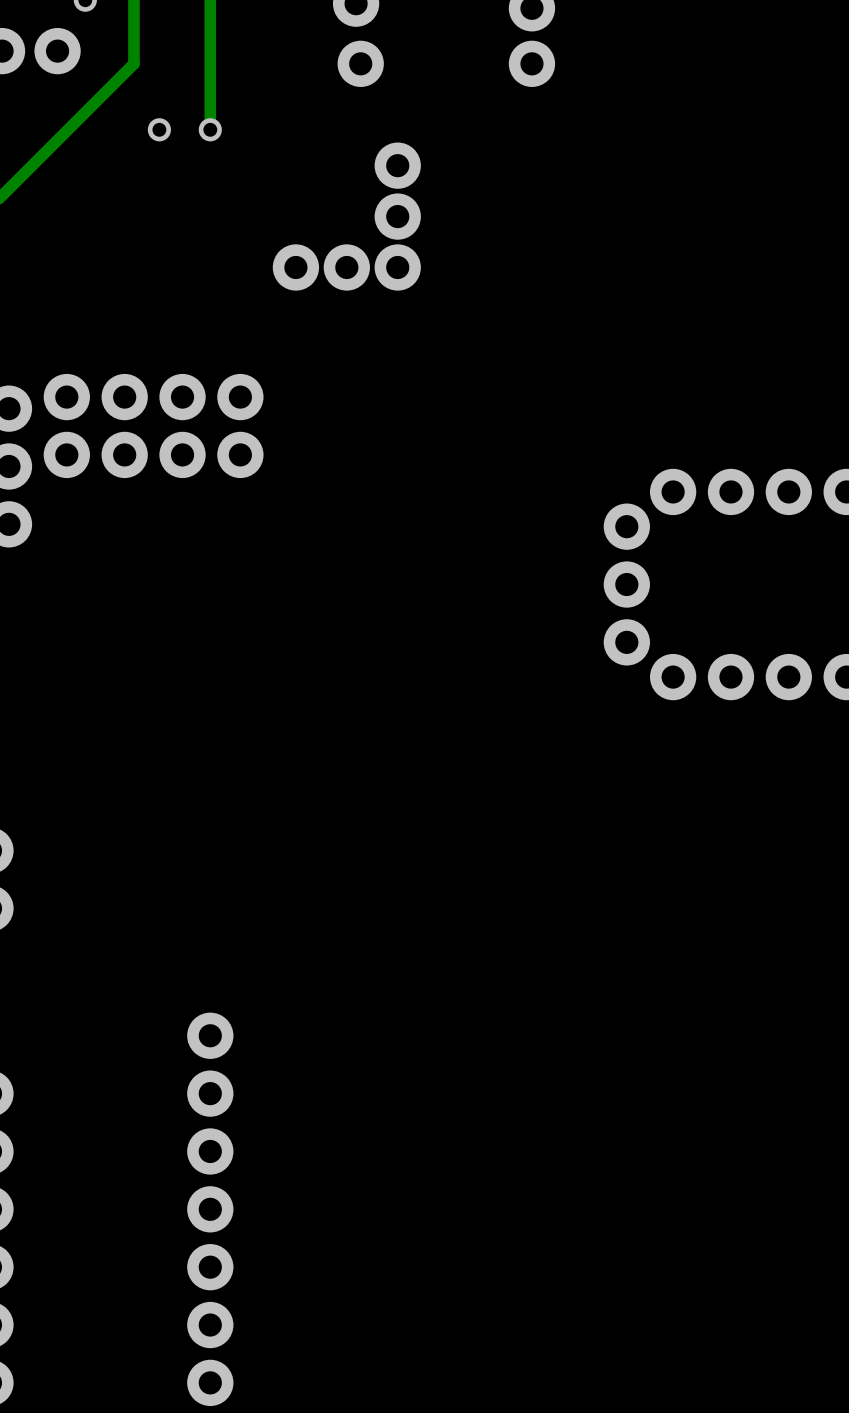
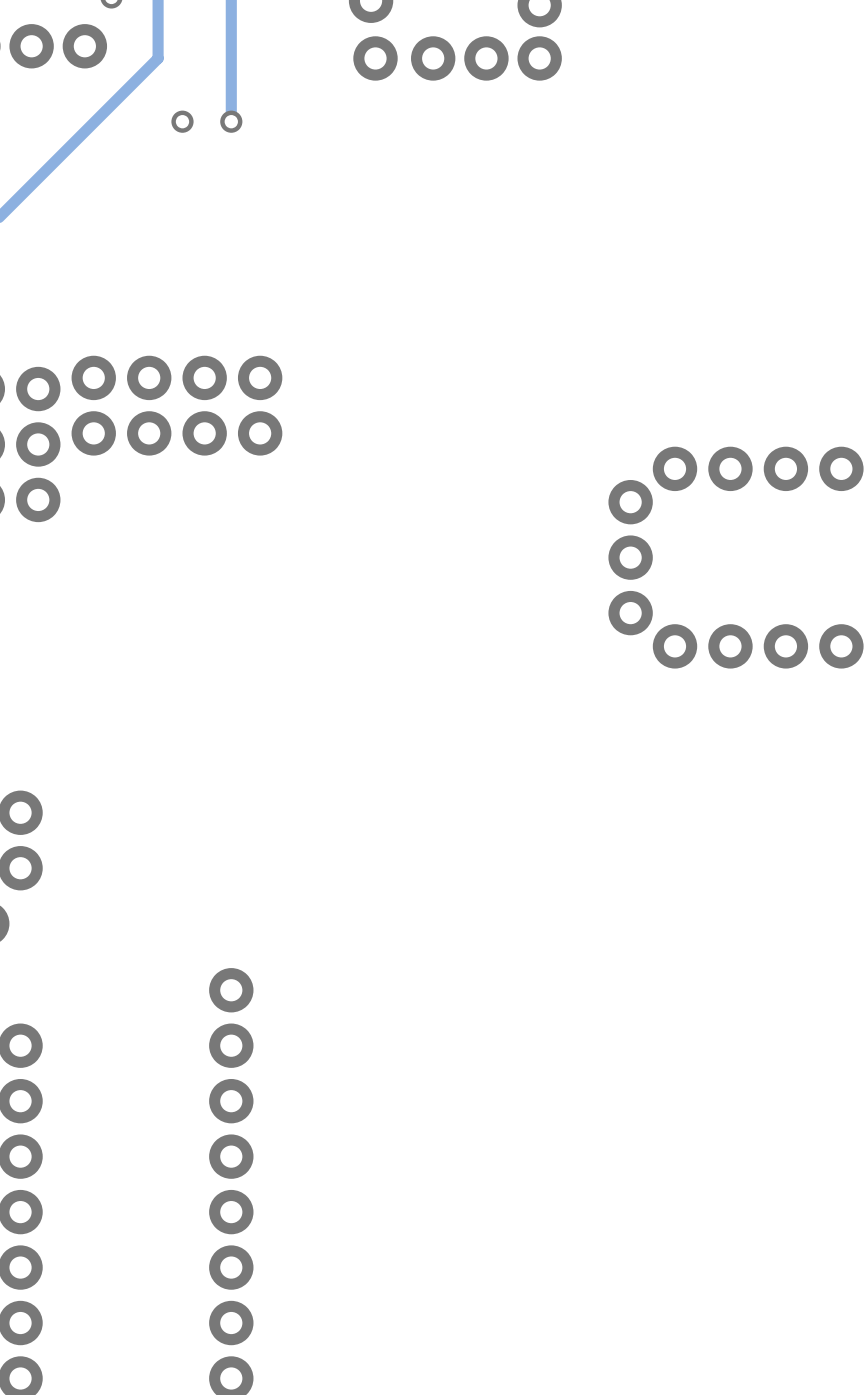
via: none -> (433, 58)
via: none -> (486, 58)
via: (397, 165) -> none
via: (397, 216) -> none
via: (295, 267) -> none
via: (346, 267) -> none
via: (397, 267) -> none

